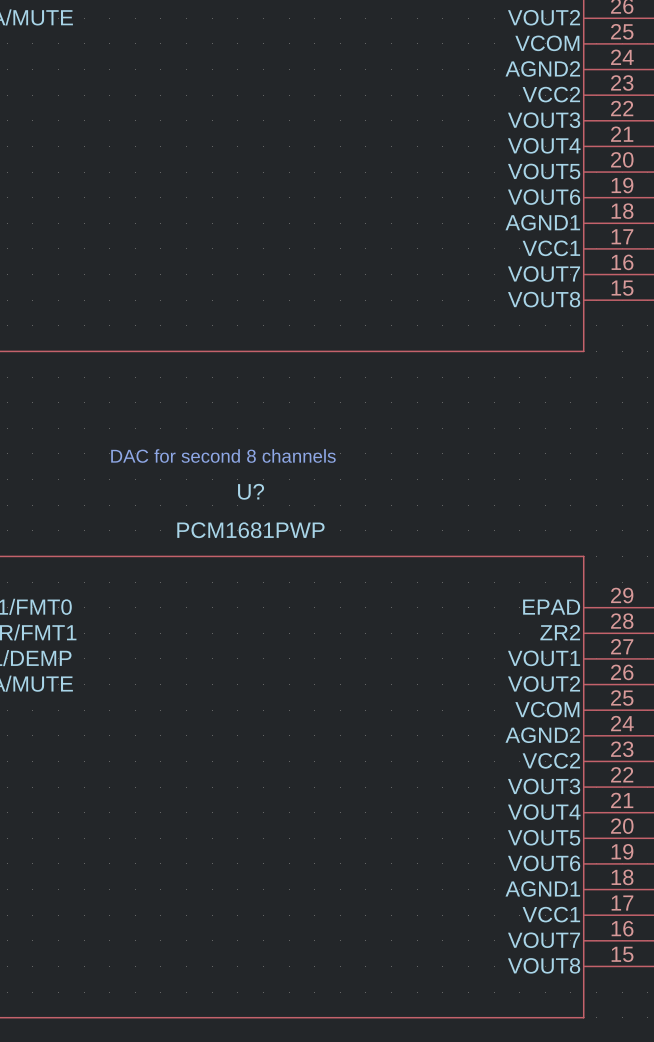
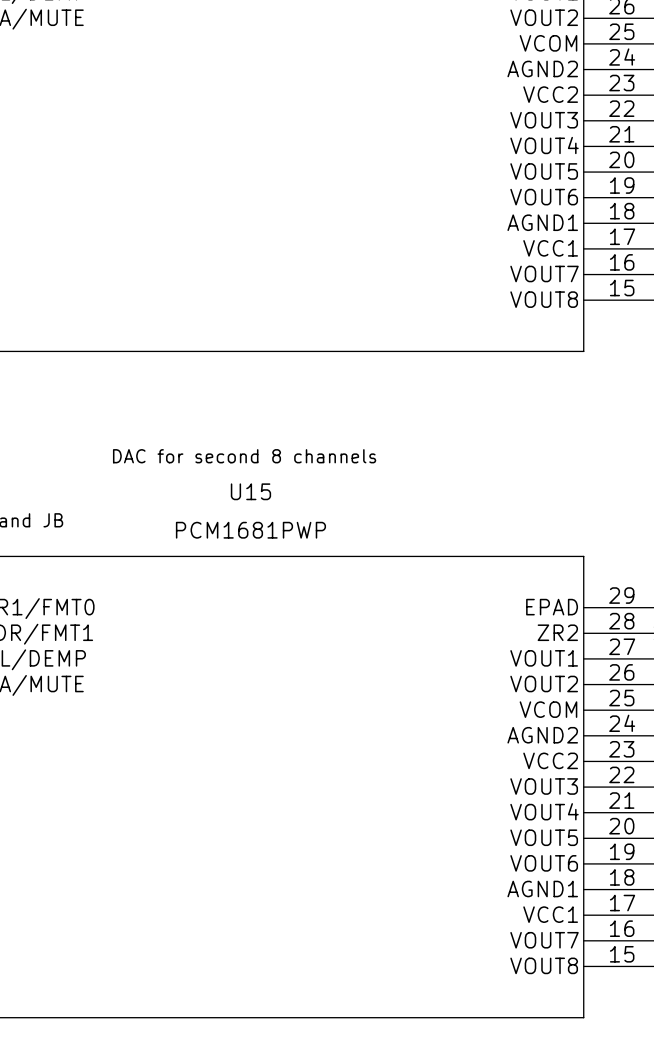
U? name: U? (251, 491) -> U15 (250, 491)

